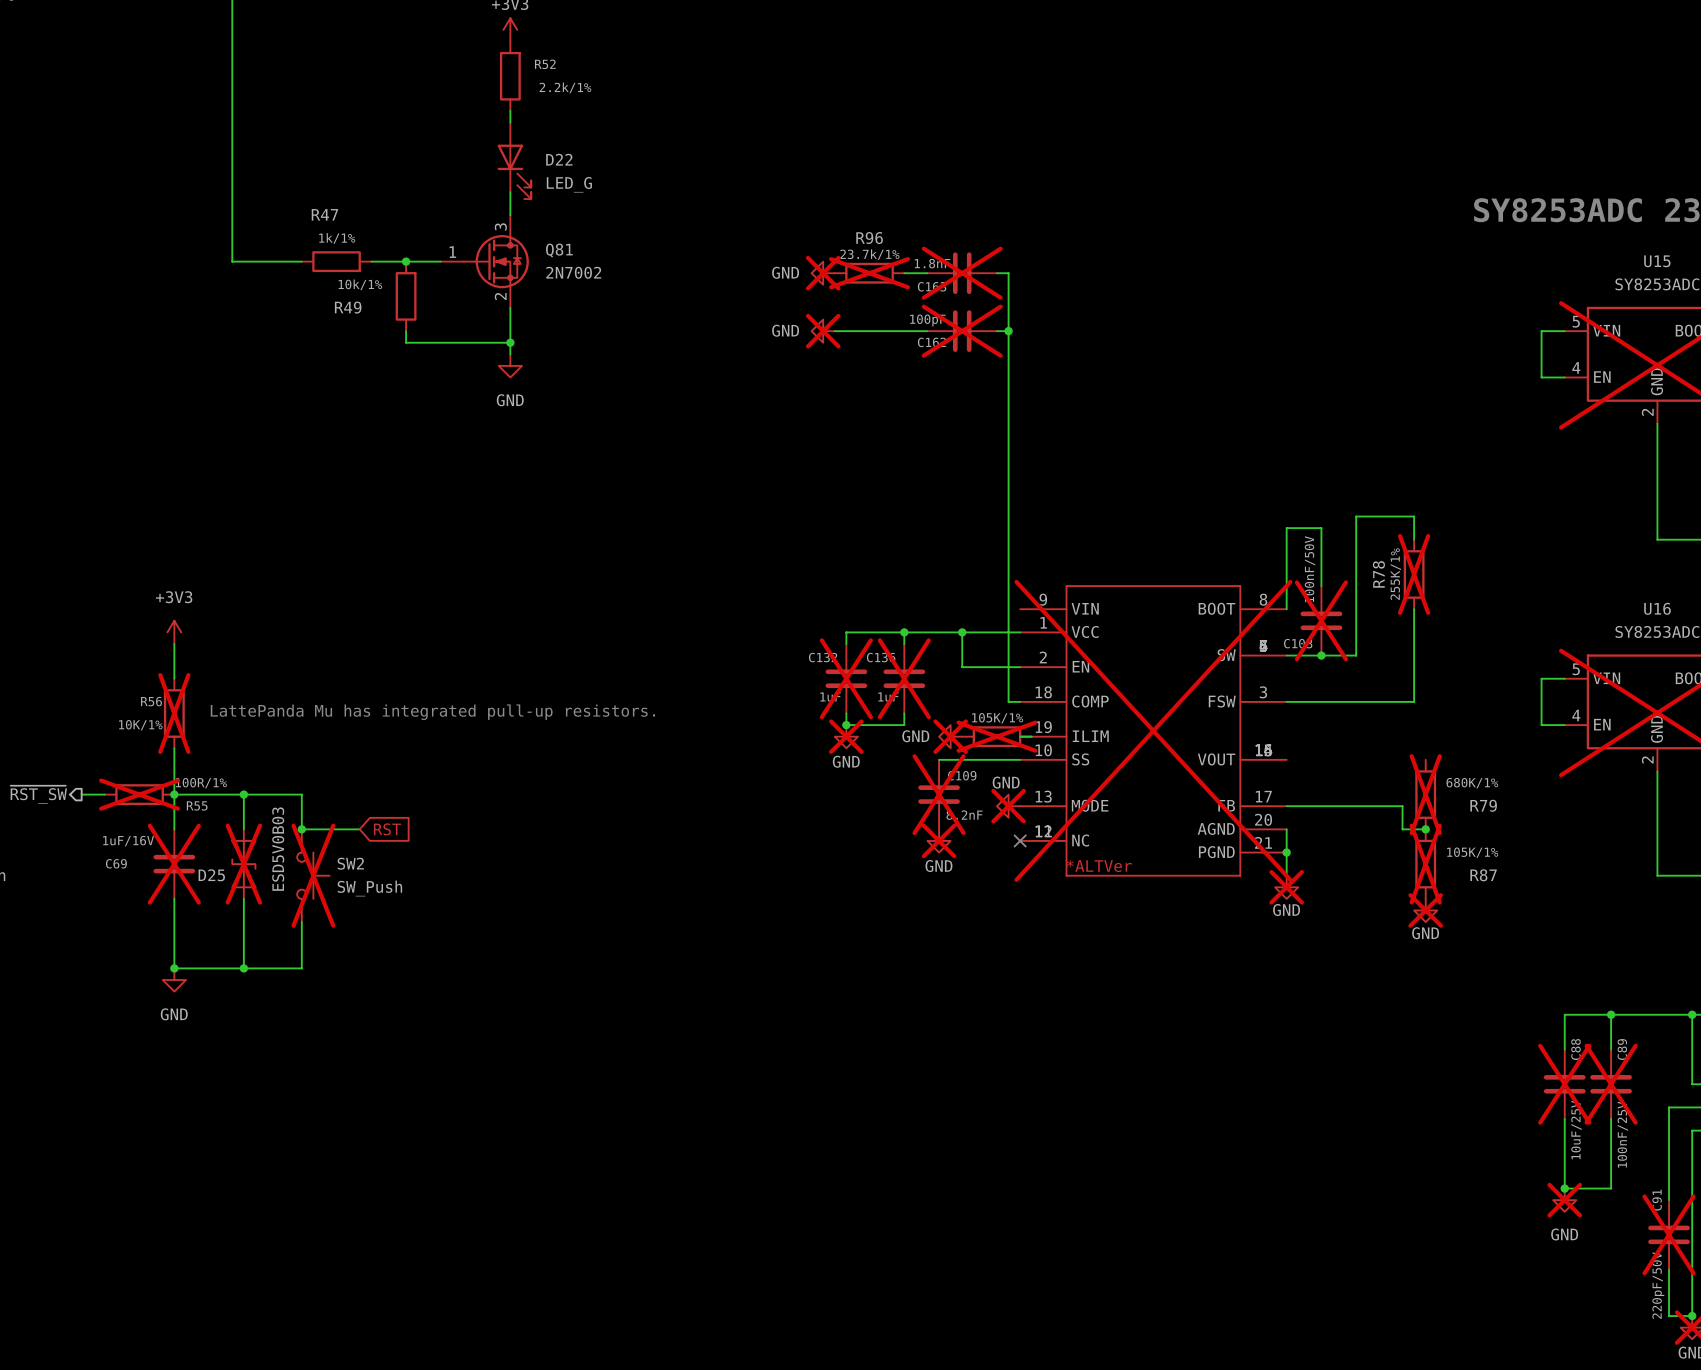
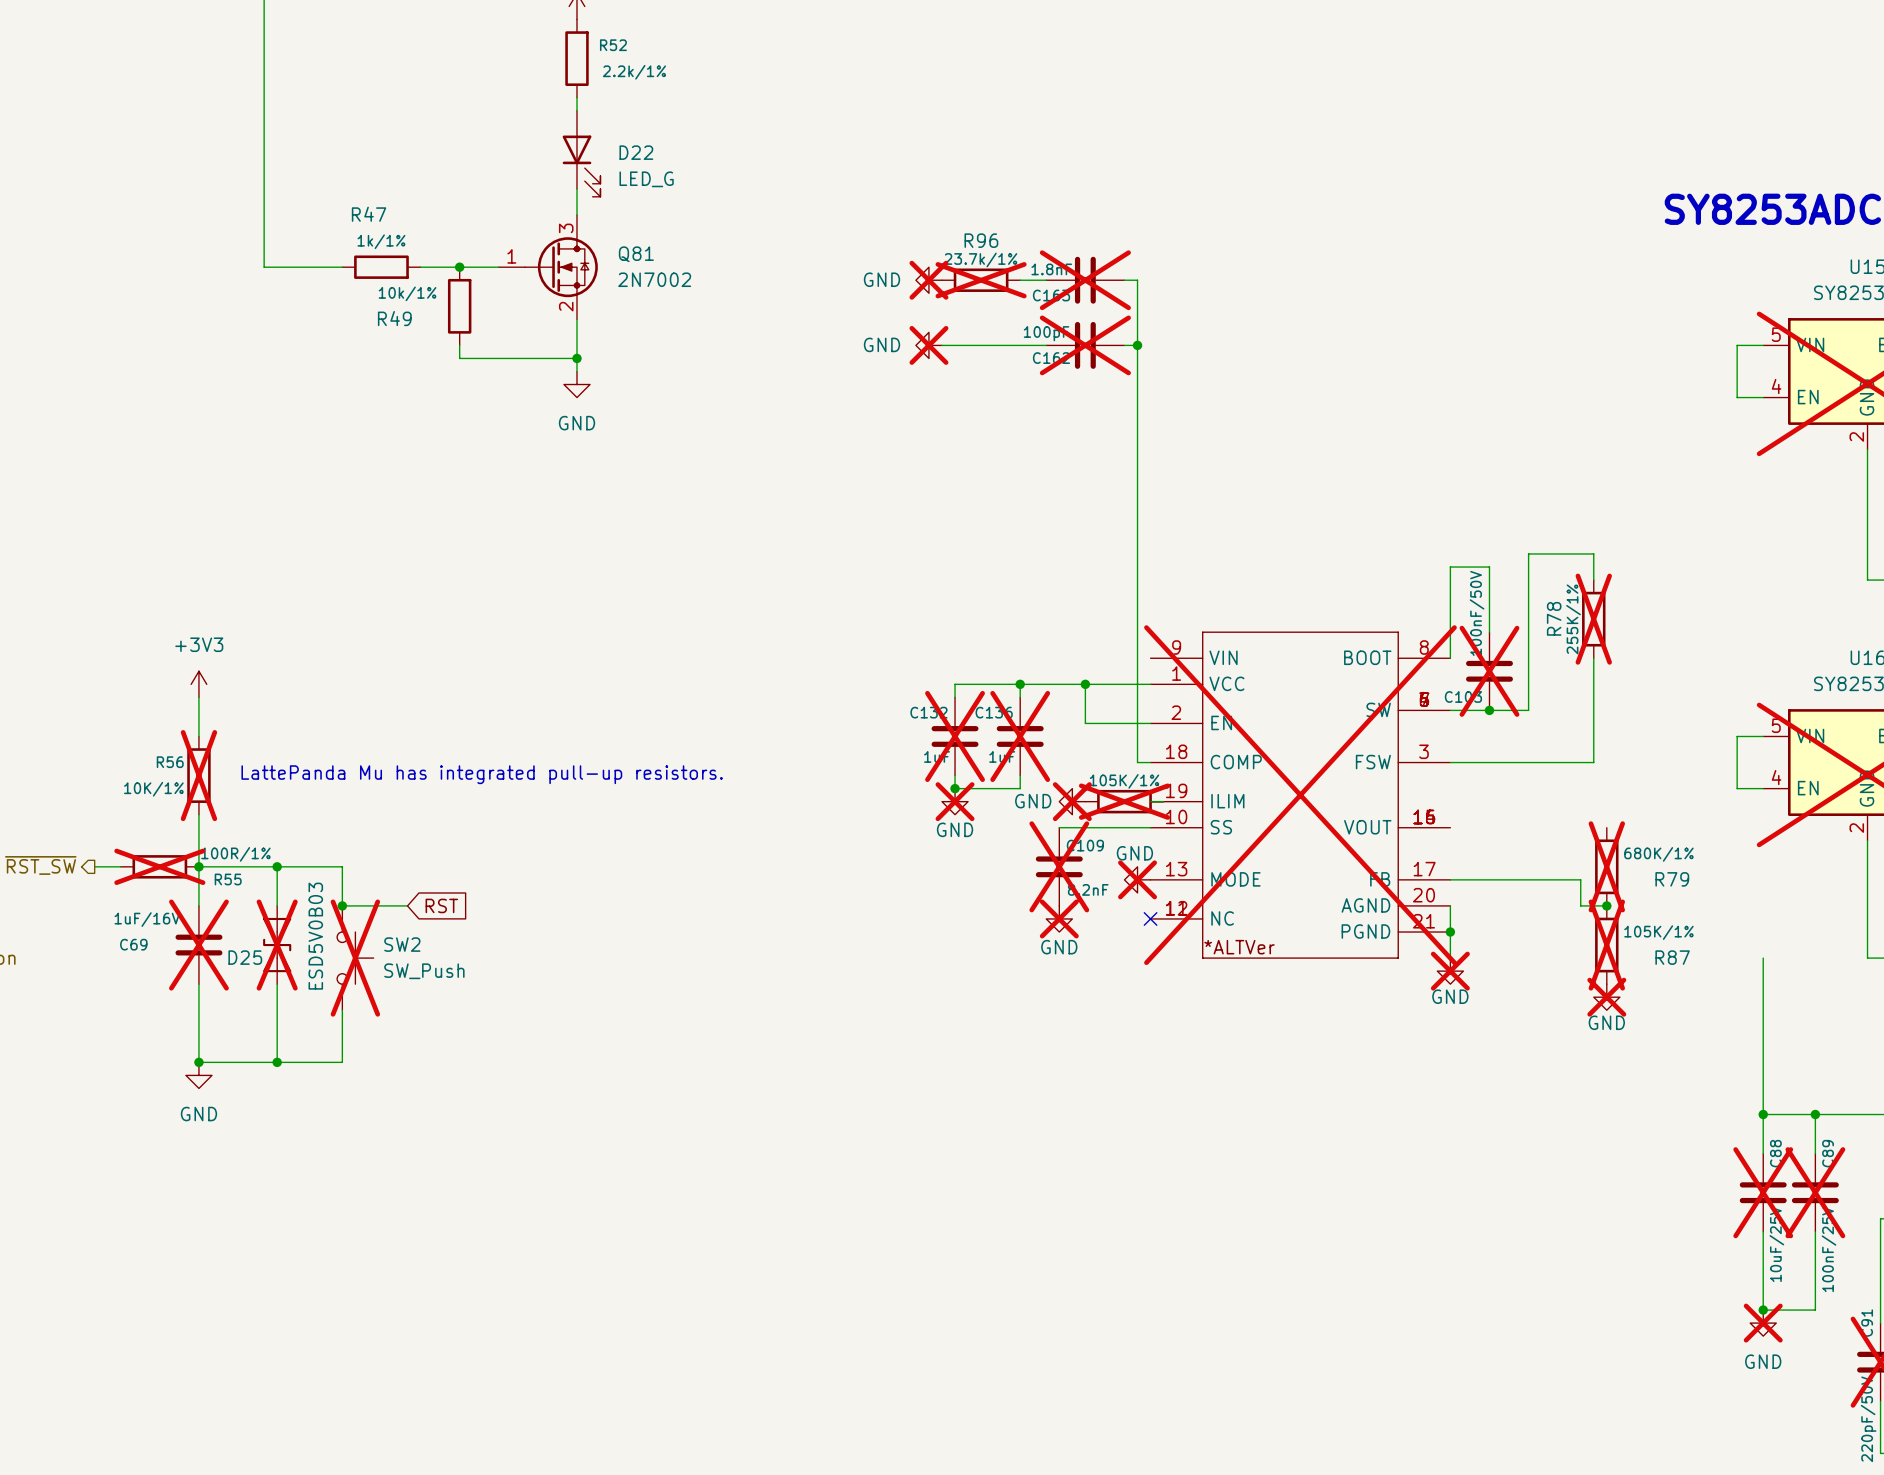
wire: none -> (1763, 958) (1763, 1114)
junction: none -> (1763, 1114)

